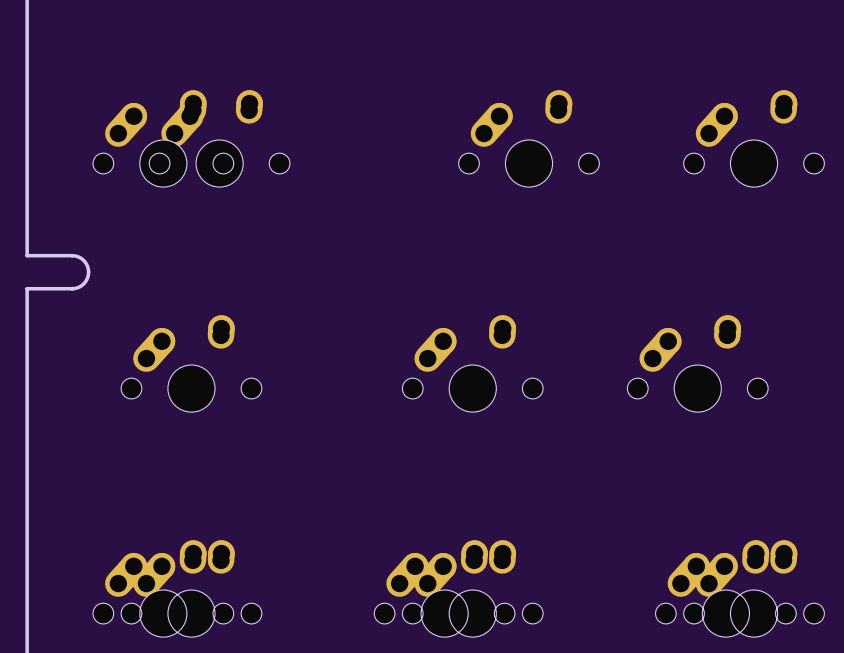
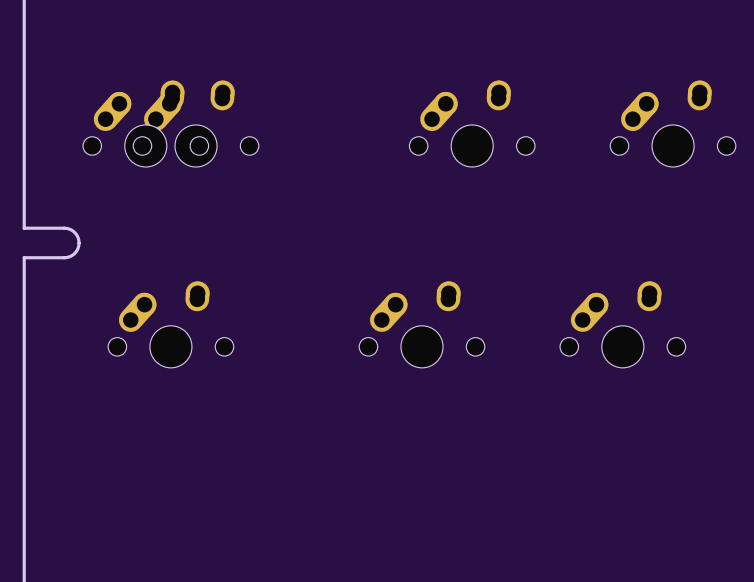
part: (163, 588) -> none
part: (191, 588) -> none
part: (444, 588) -> none
part: (472, 588) -> none
part: (725, 588) -> none
part: (754, 588) -> none

